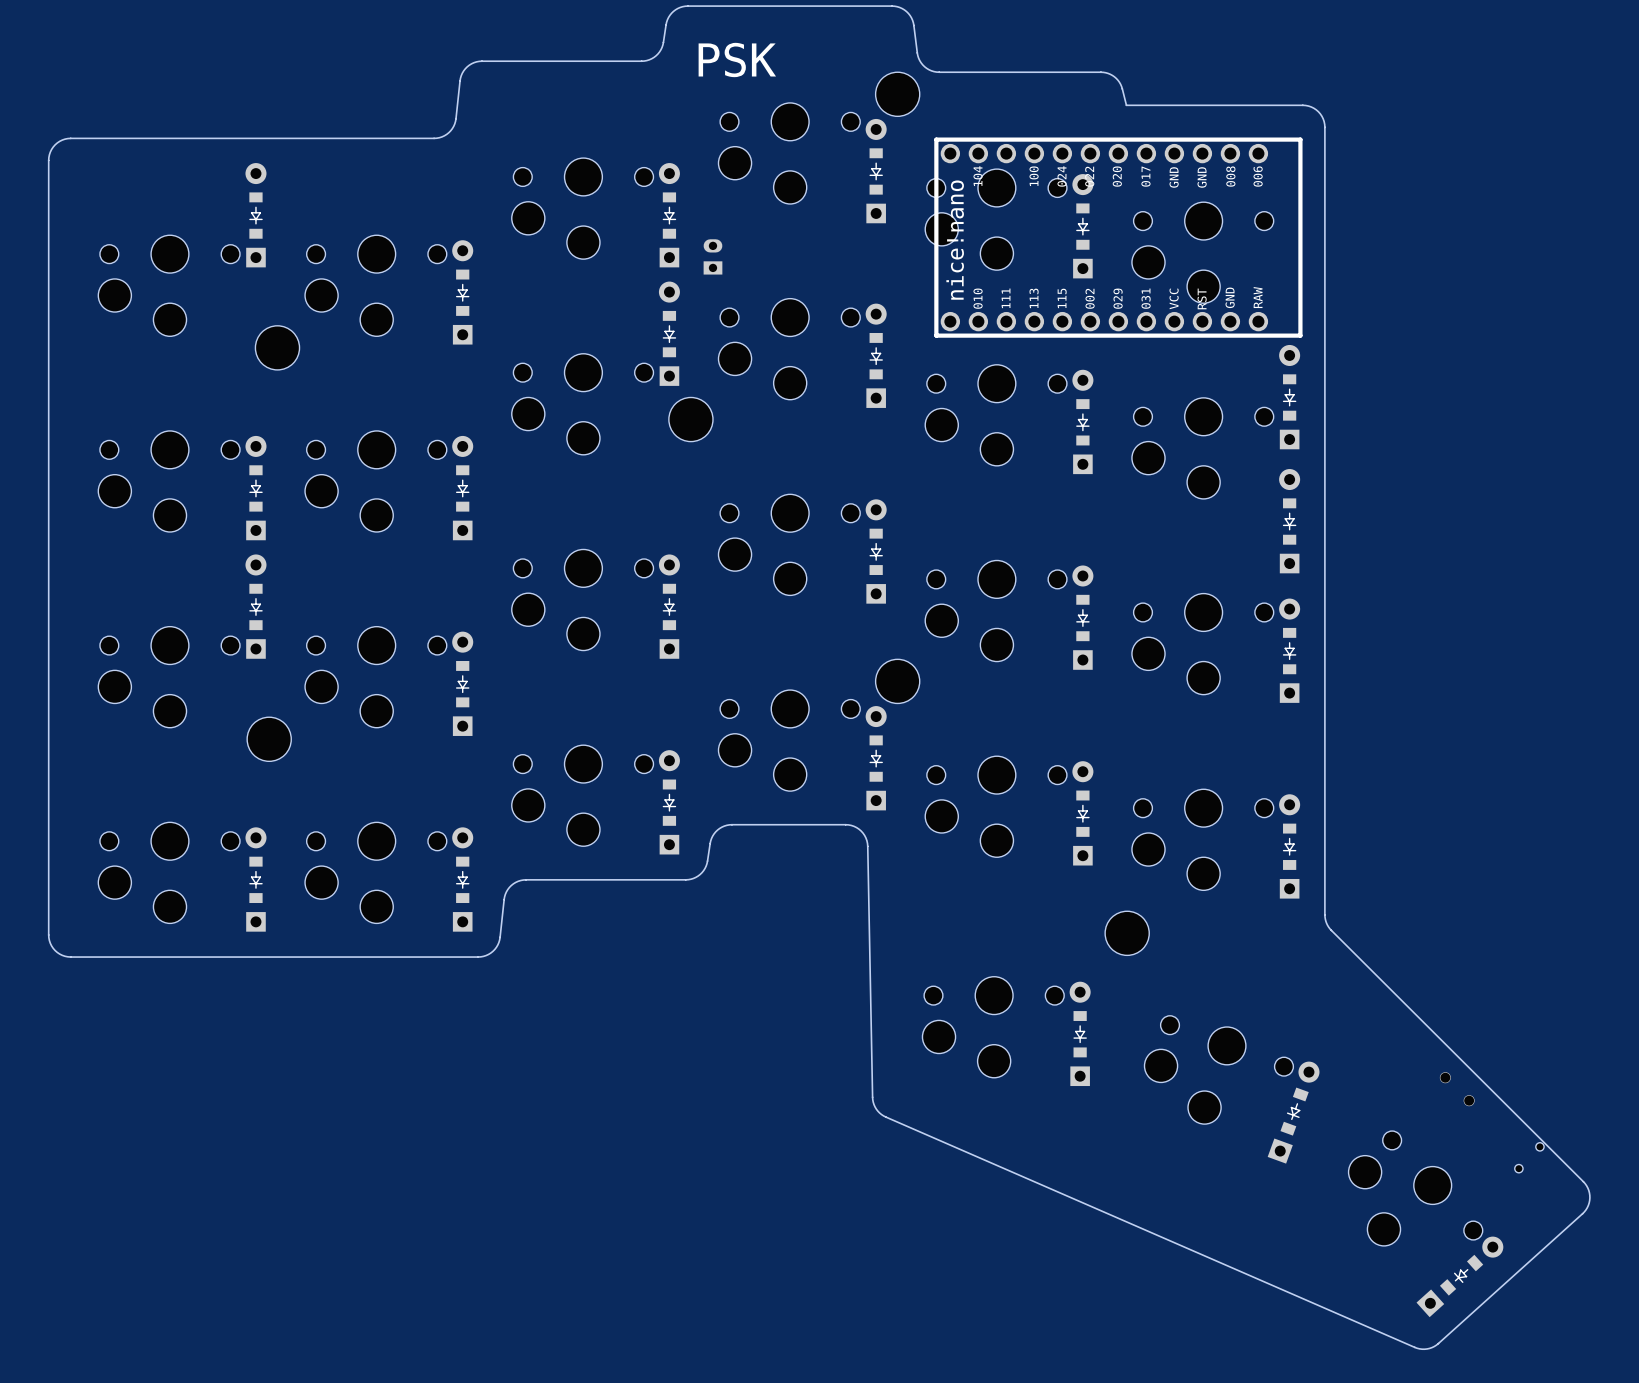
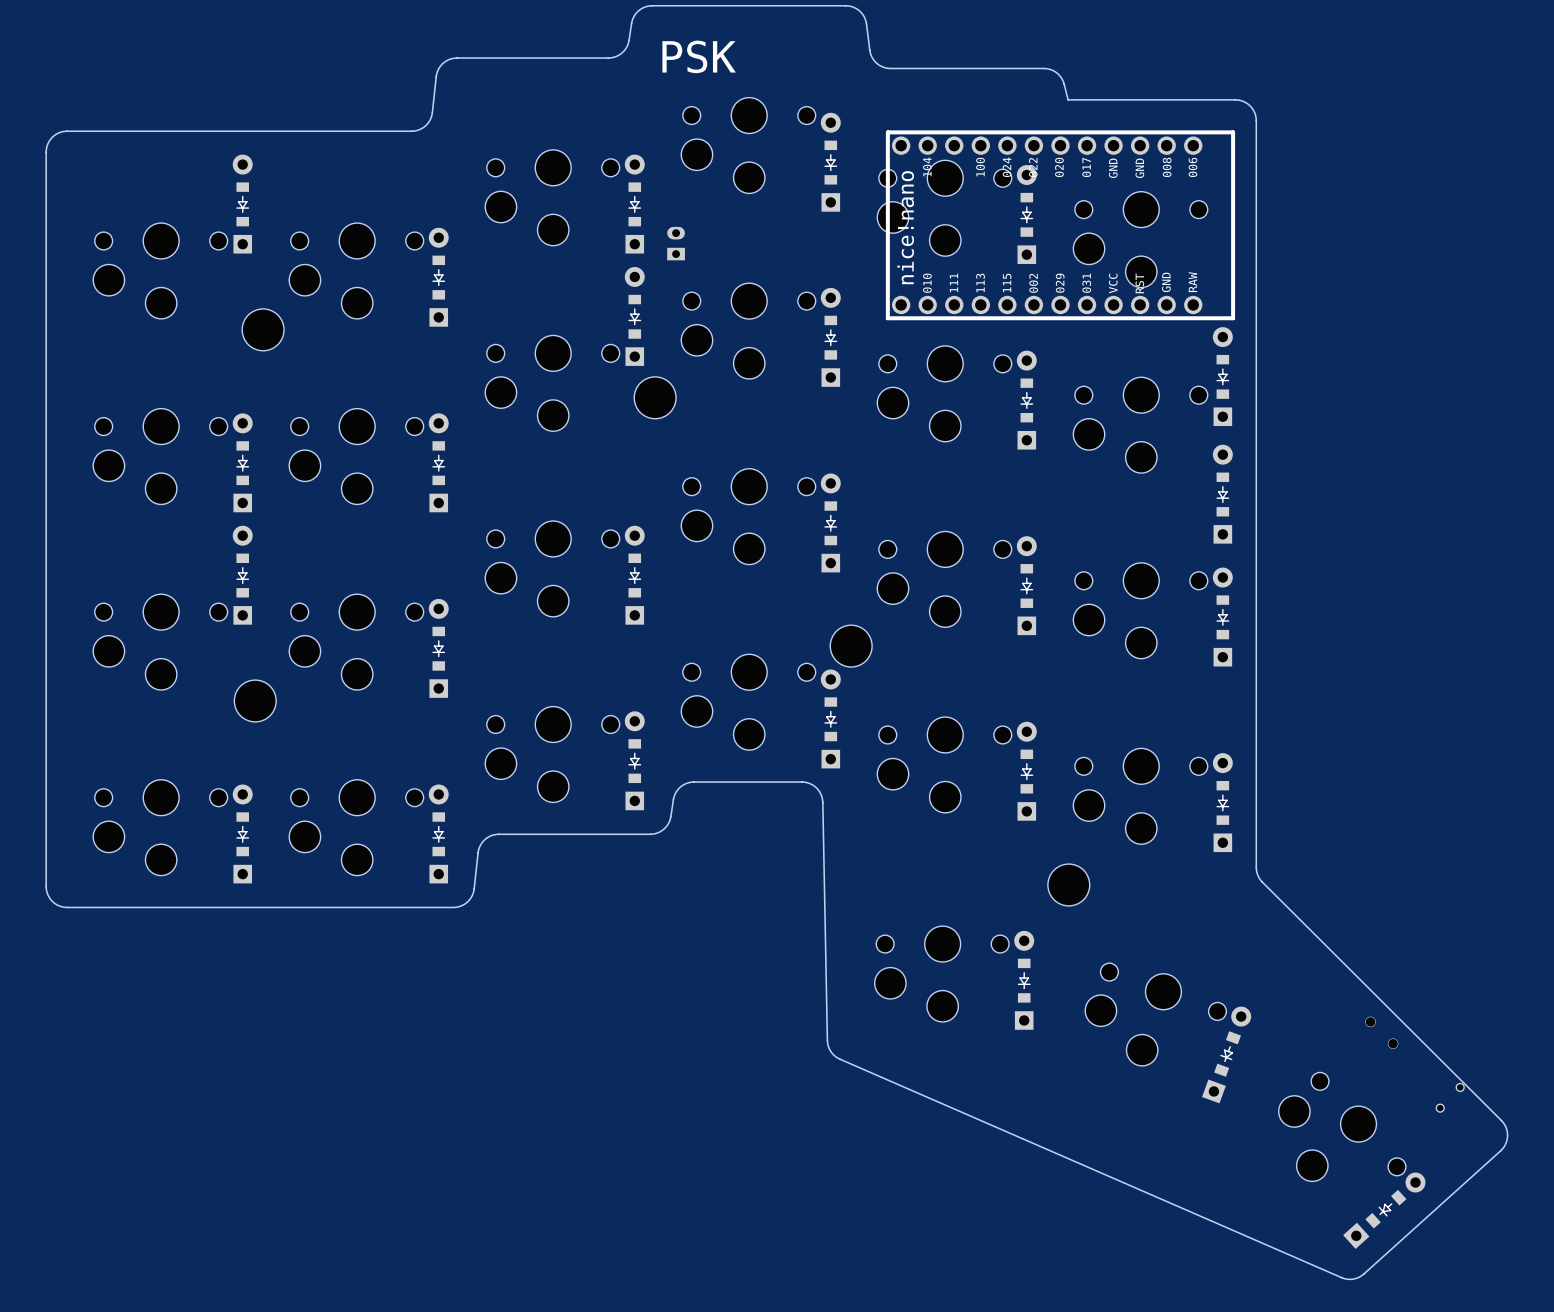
part: (897, 94) -> none

